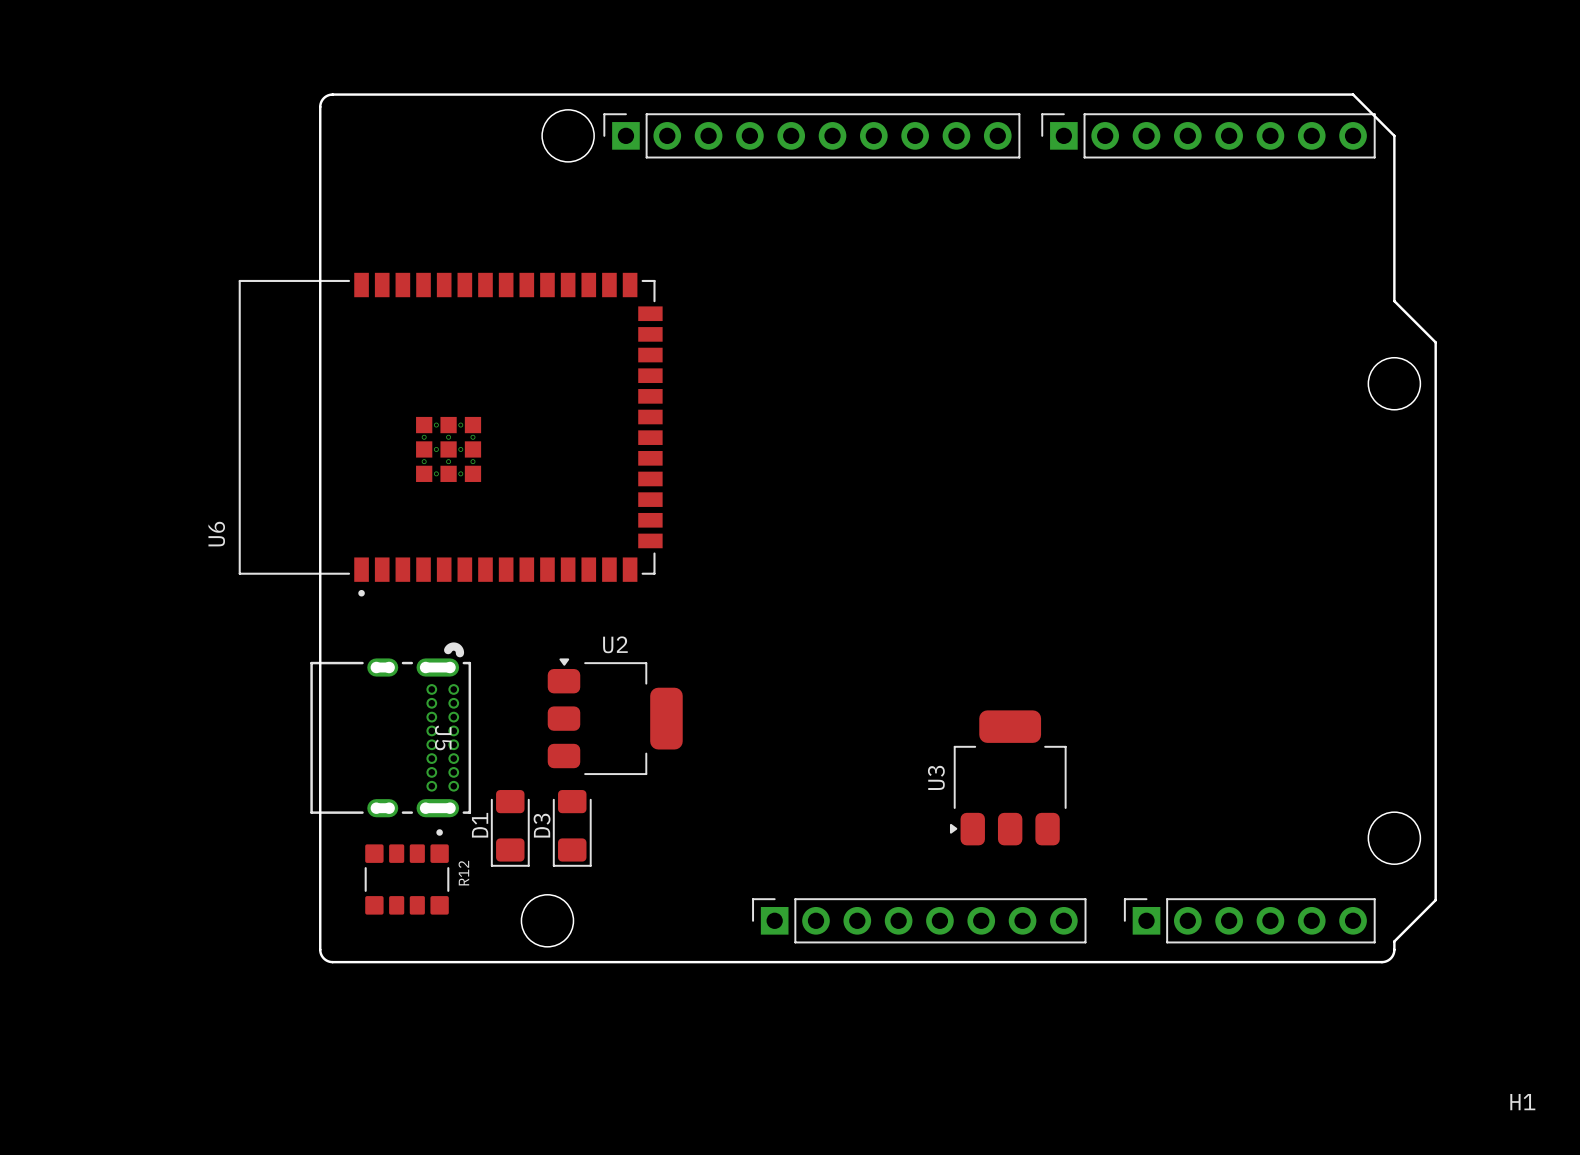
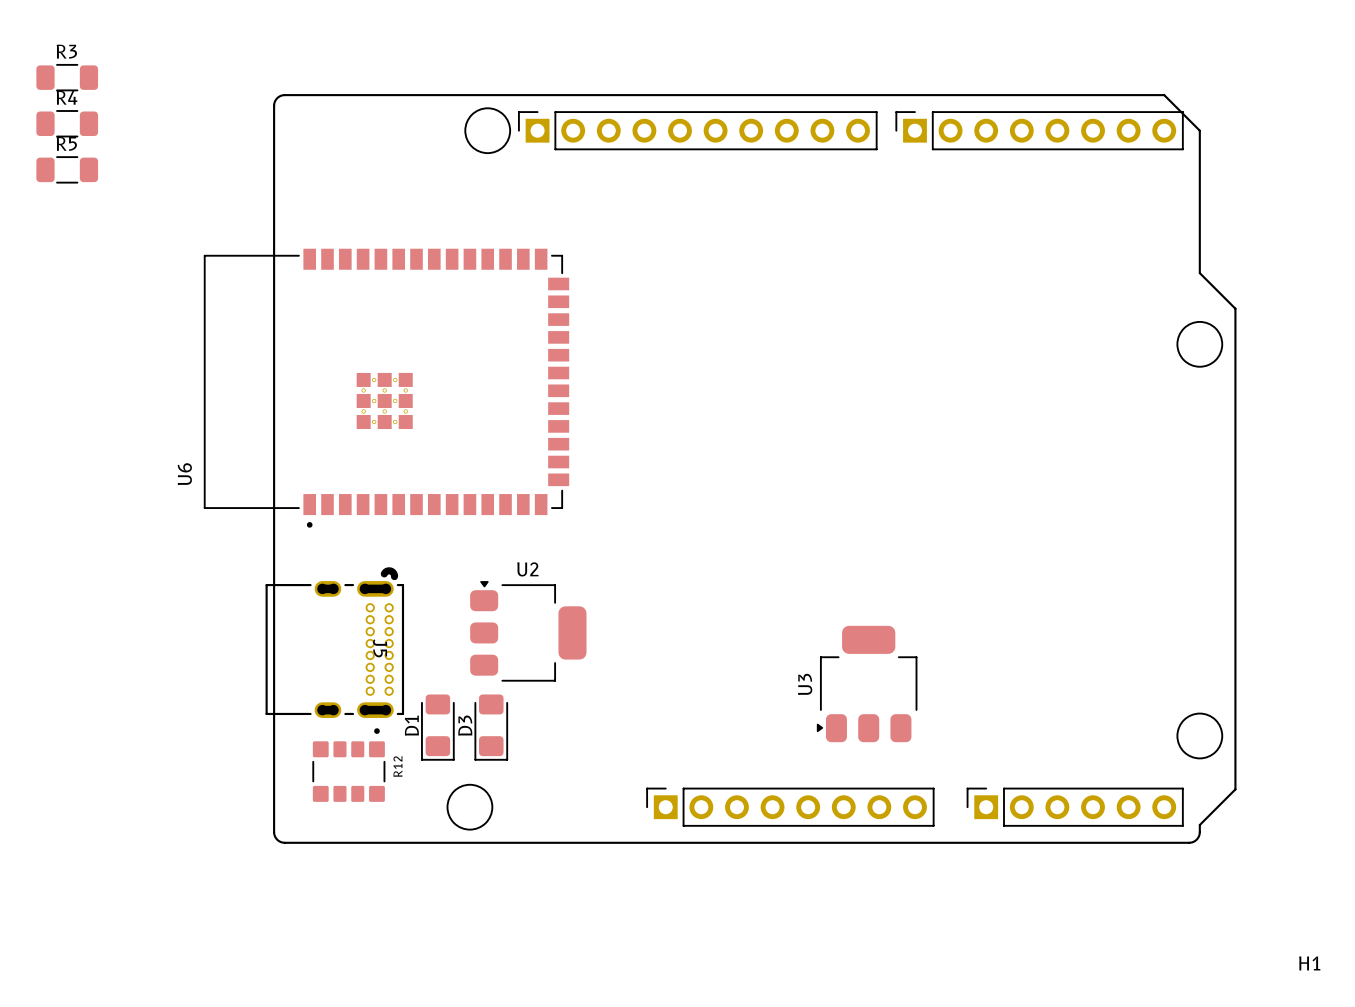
R3: none -> (67, 77)
R4: none -> (67, 123)
R5: none -> (67, 169)

